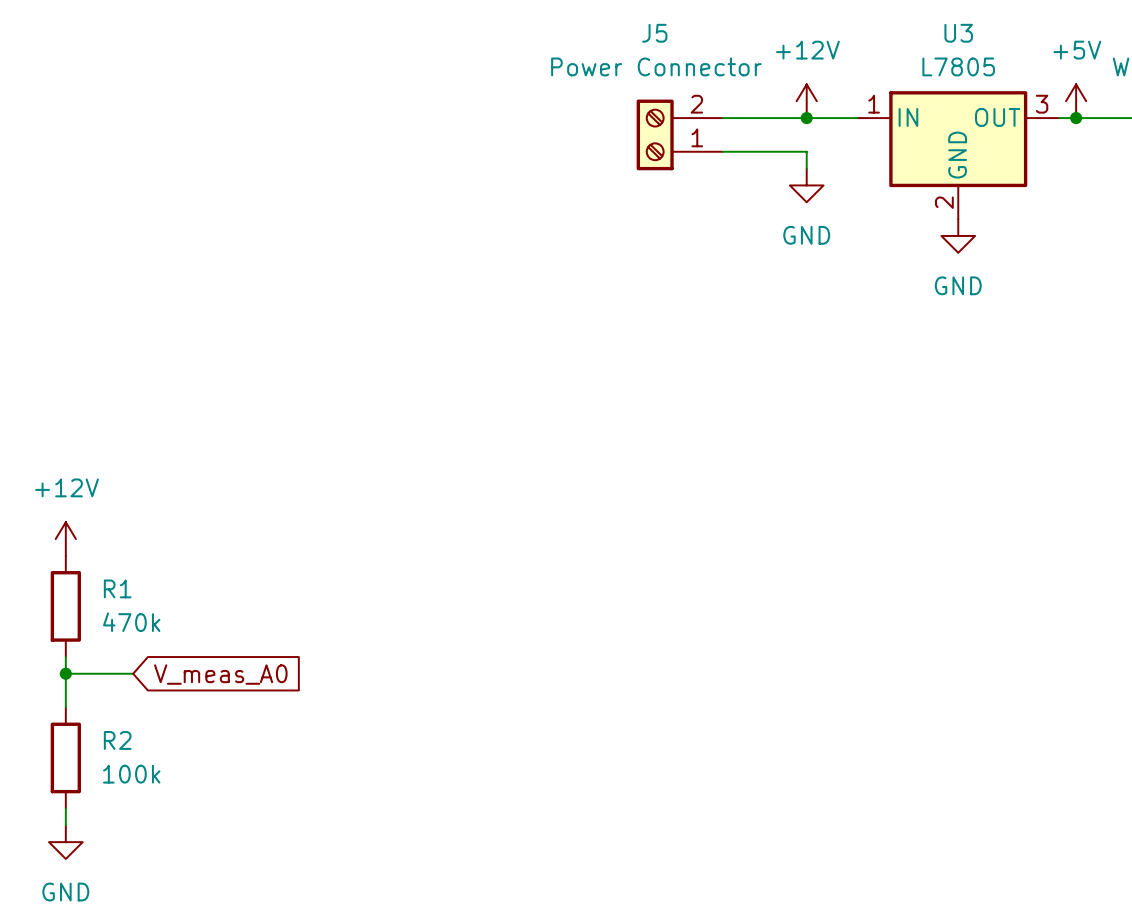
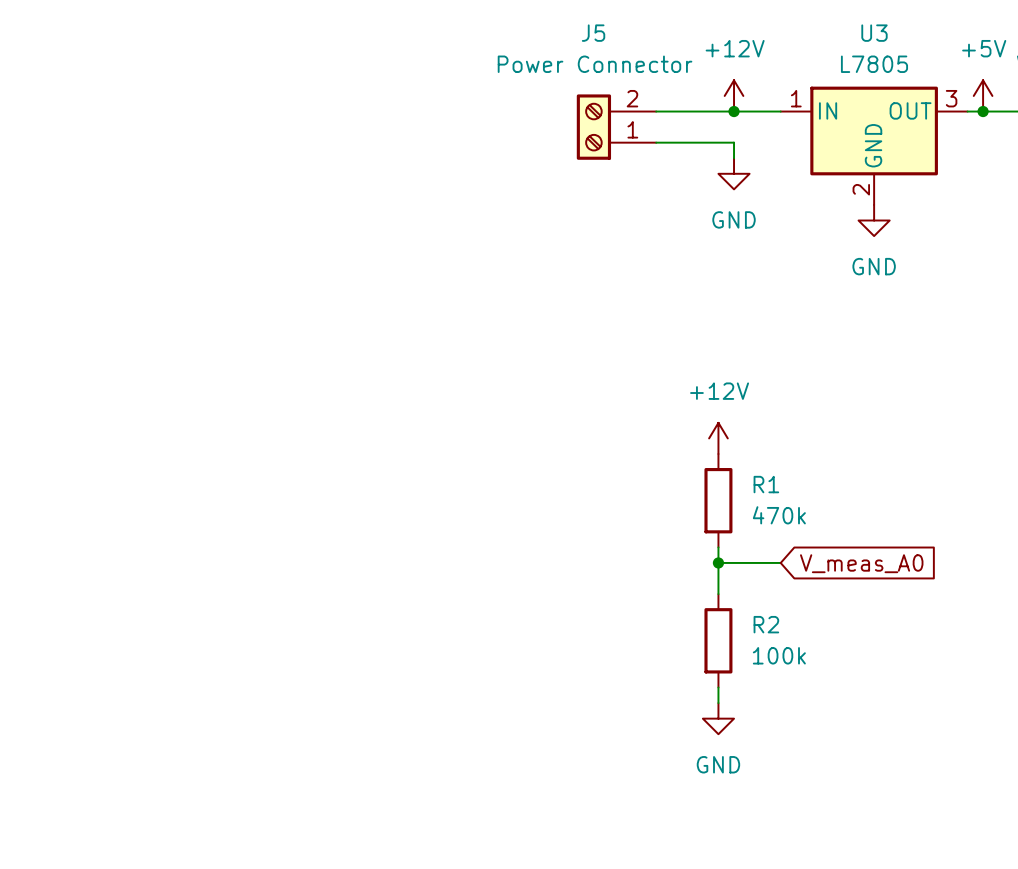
power symbol: none -> +12V (718, 438)
power symbol: +12V (65, 539) -> none
wire: none -> (718, 547) (718, 594)
R1 position: (65, 606) -> (718, 500)
wire: none -> (718, 562) (780, 562)
junction: none -> (718, 562)
global label: none -> V_meas_A0 (861, 563)
wire: (65, 656) (65, 707) -> none
wire: (65, 673) (133, 673) -> none
junction: (65, 673) -> none
global label: V_meas_A0 (220, 674) -> none
wire: none -> (718, 687) (718, 703)
R2 position: (65, 757) -> (718, 640)
power symbol: none -> GND (718, 718)
wire: (65, 808) (65, 825) -> none
power symbol: GND (65, 842) -> none

